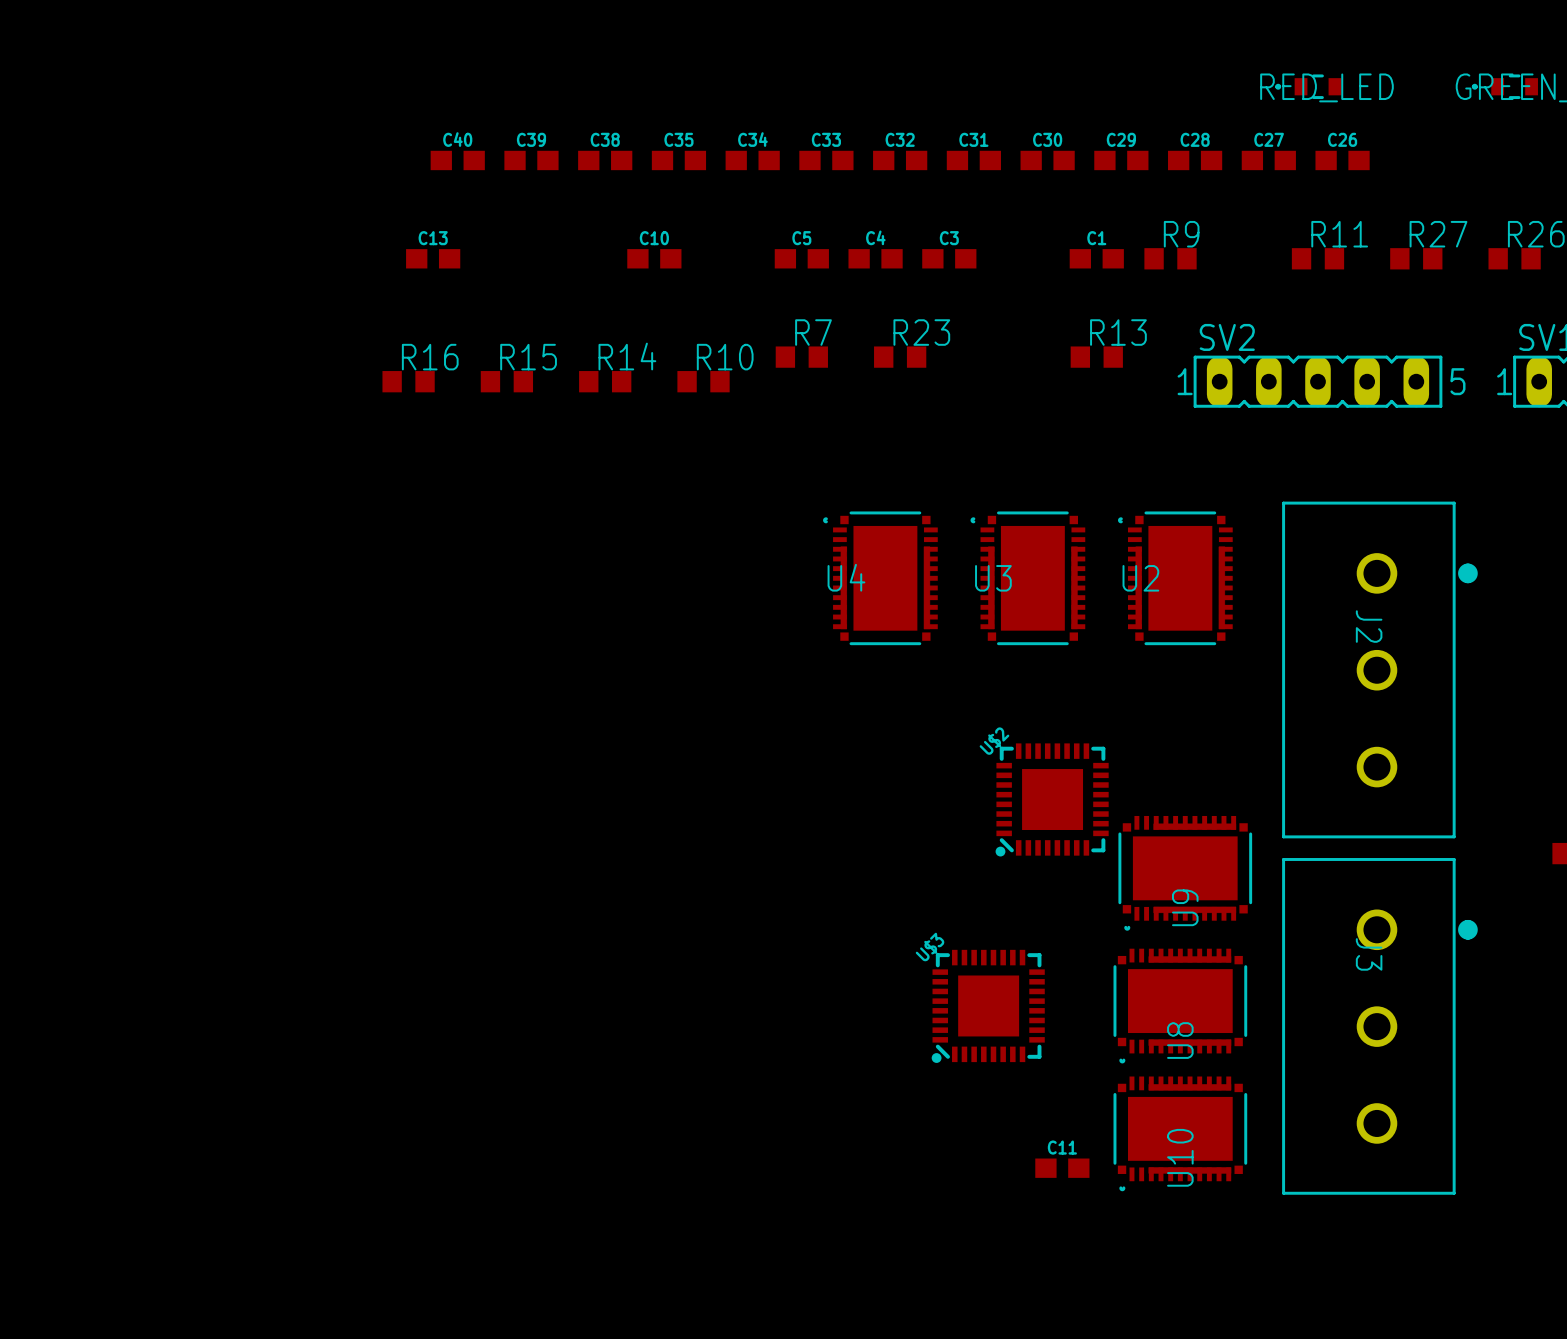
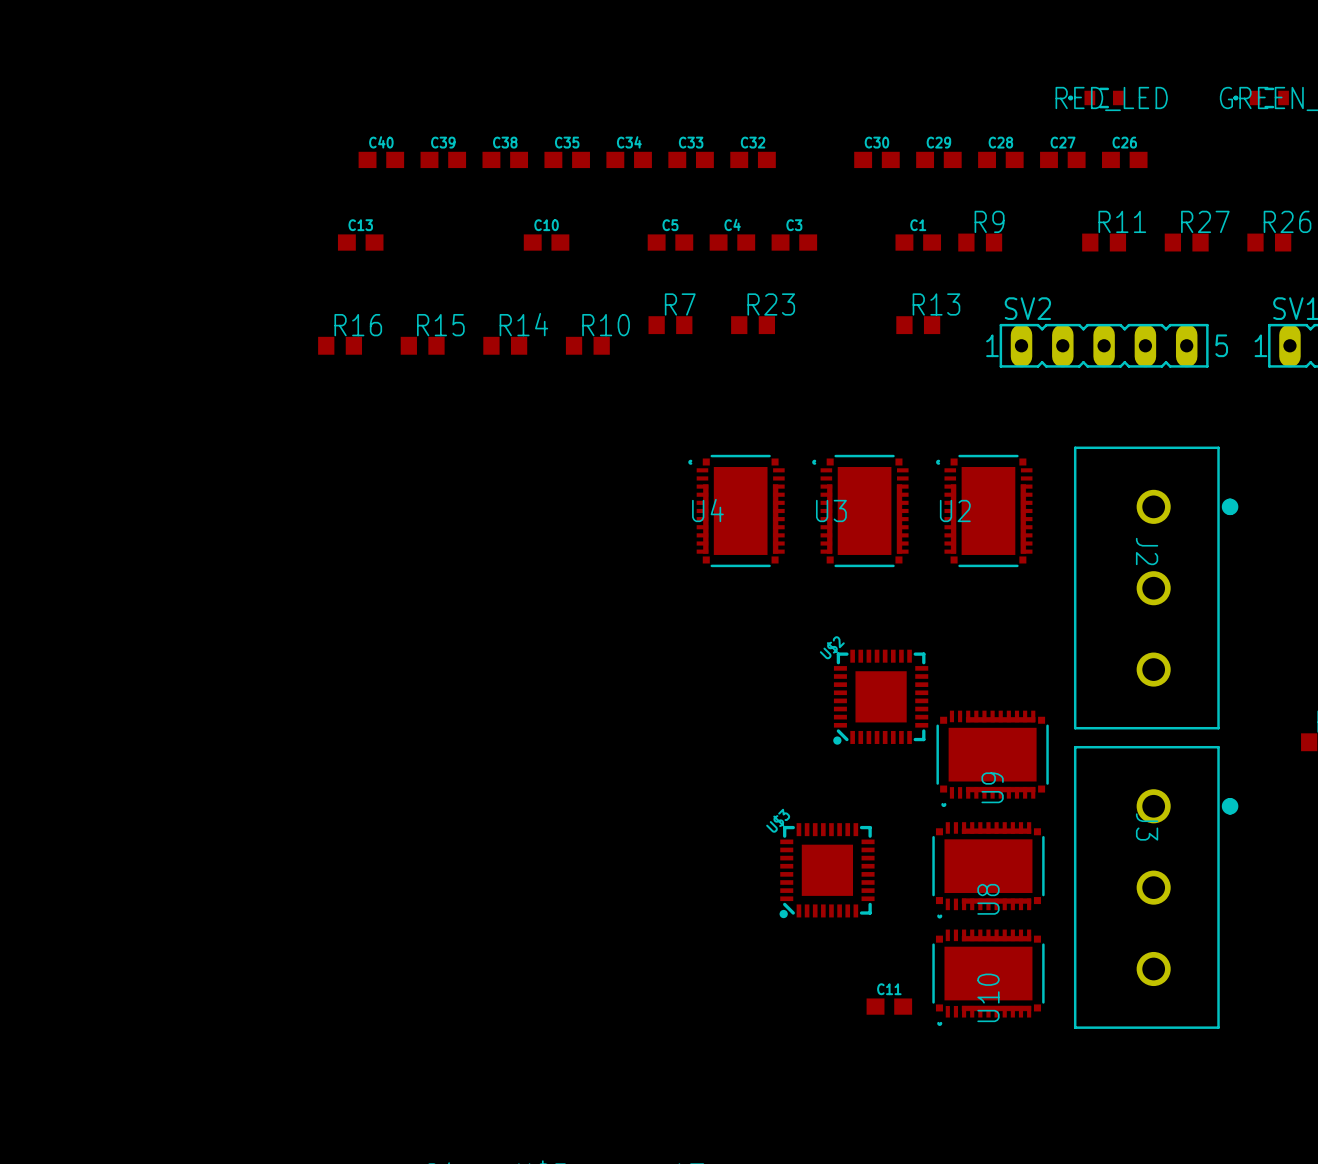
C31: (973, 160) -> none

